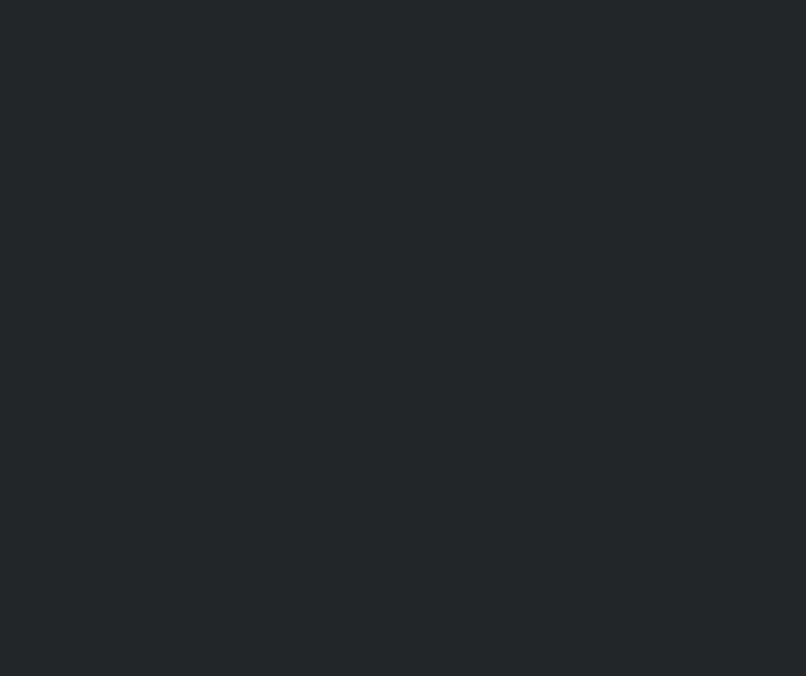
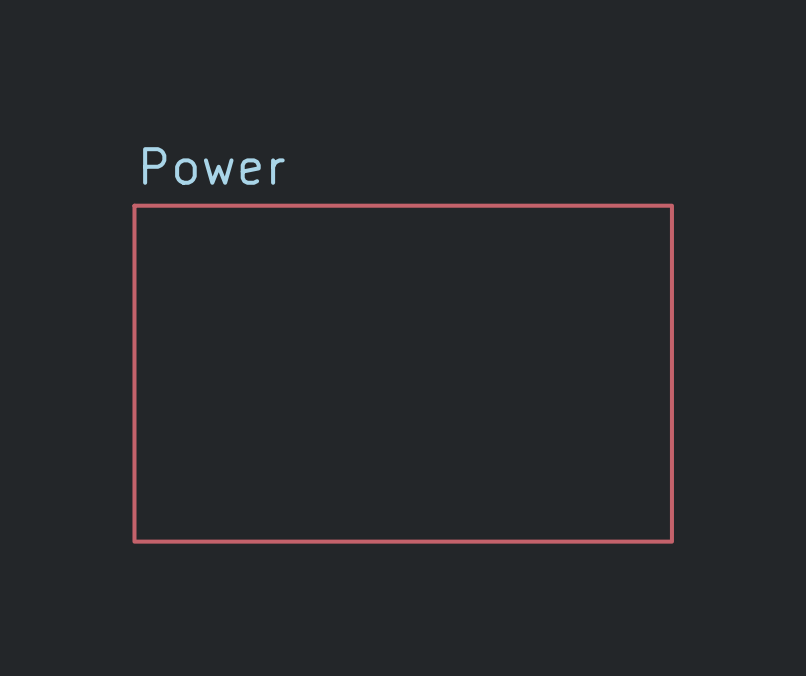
sheet Power: none -> (403, 373)

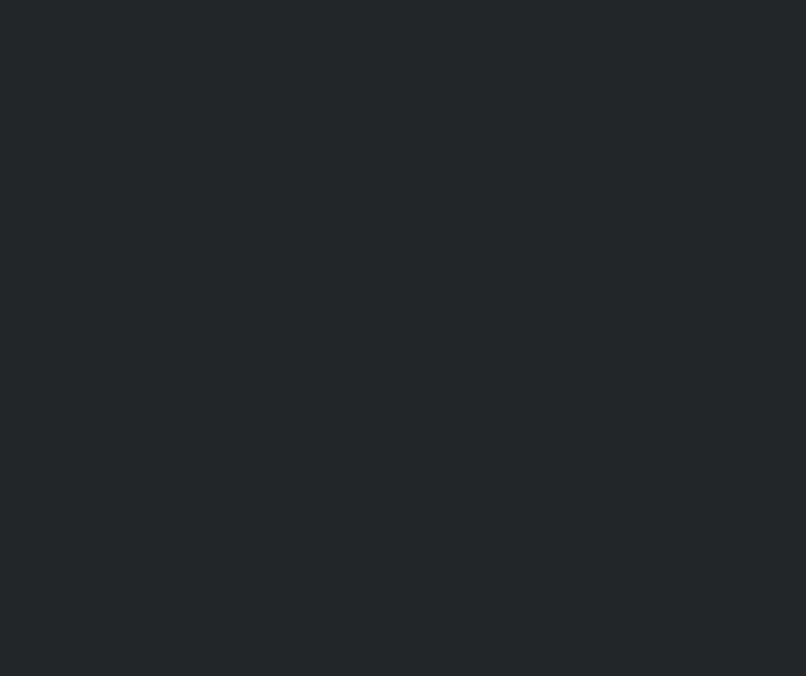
sheet Power: (403, 373) -> none

